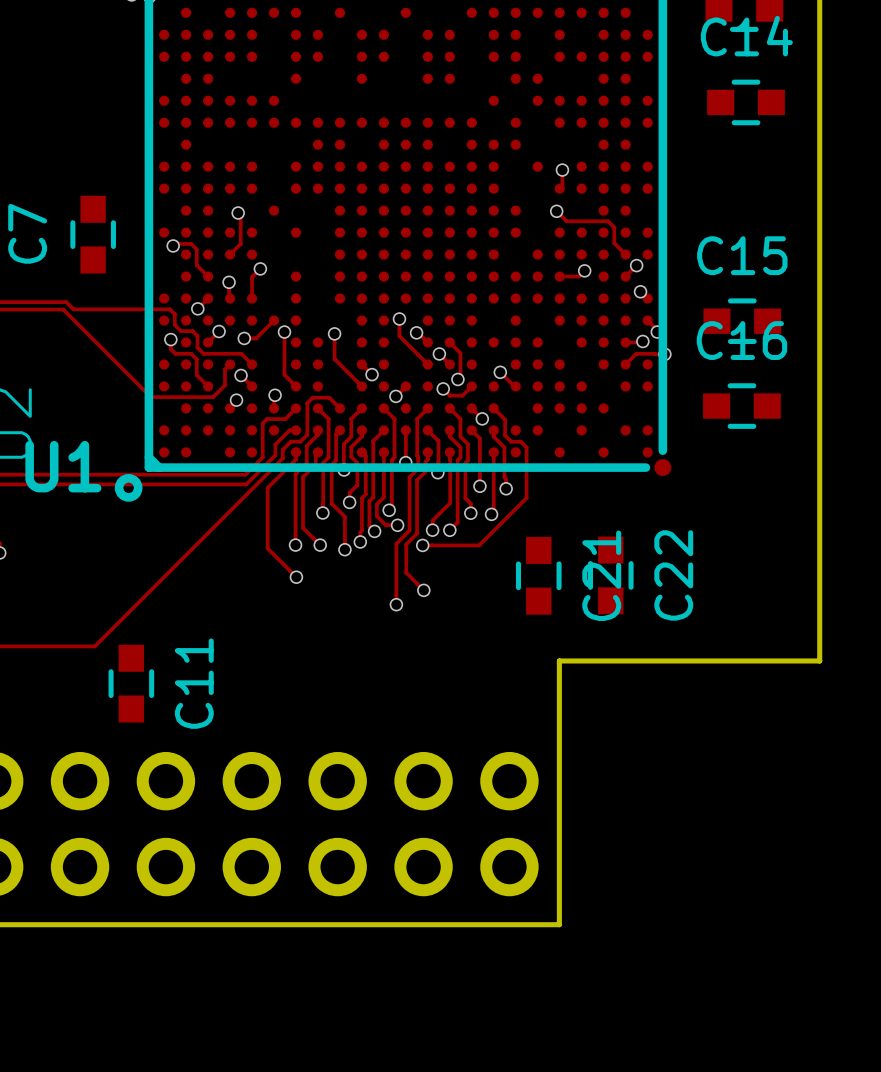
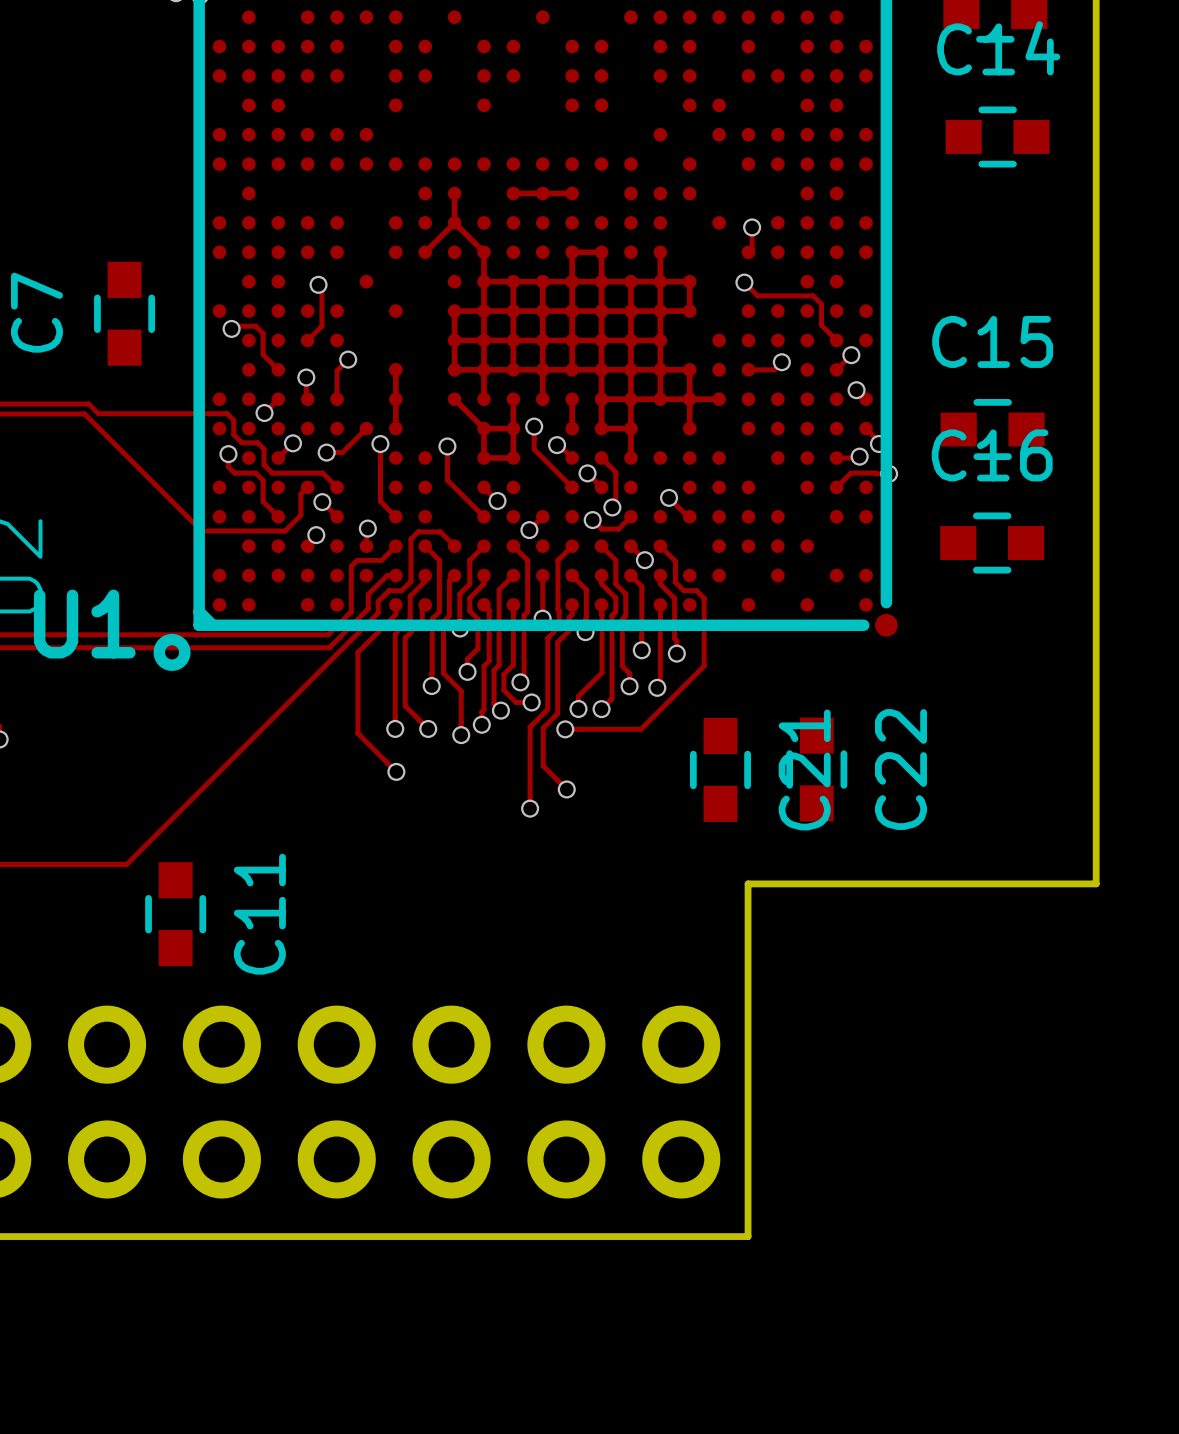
track: none -> (454, 193) (454, 222)
track: none -> (513, 193) (572, 193)
track: none -> (454, 222) (484, 252) (484, 399)
track: none -> (454, 222) (425, 252)
track: none -> (660, 252) (660, 399)
track: none -> (484, 281) (689, 281) (689, 311) (454, 311) (454, 369) (689, 369) (689, 428)
track: none -> (513, 281) (513, 369)
track: none -> (542, 281) (542, 399)
track: none -> (630, 281) (630, 458)
track: none -> (454, 340) (660, 340)
track: none -> (395, 369) (395, 428)
track: none -> (572, 369) (572, 252) (601, 252) (601, 428) (630, 428)
track: none -> (454, 399) (484, 428)
track: none -> (513, 399) (513, 458) (484, 458) (484, 428)
track: none -> (572, 399) (572, 428)
track: none -> (601, 399) (719, 399)
track: none -> (484, 428) (513, 428)

